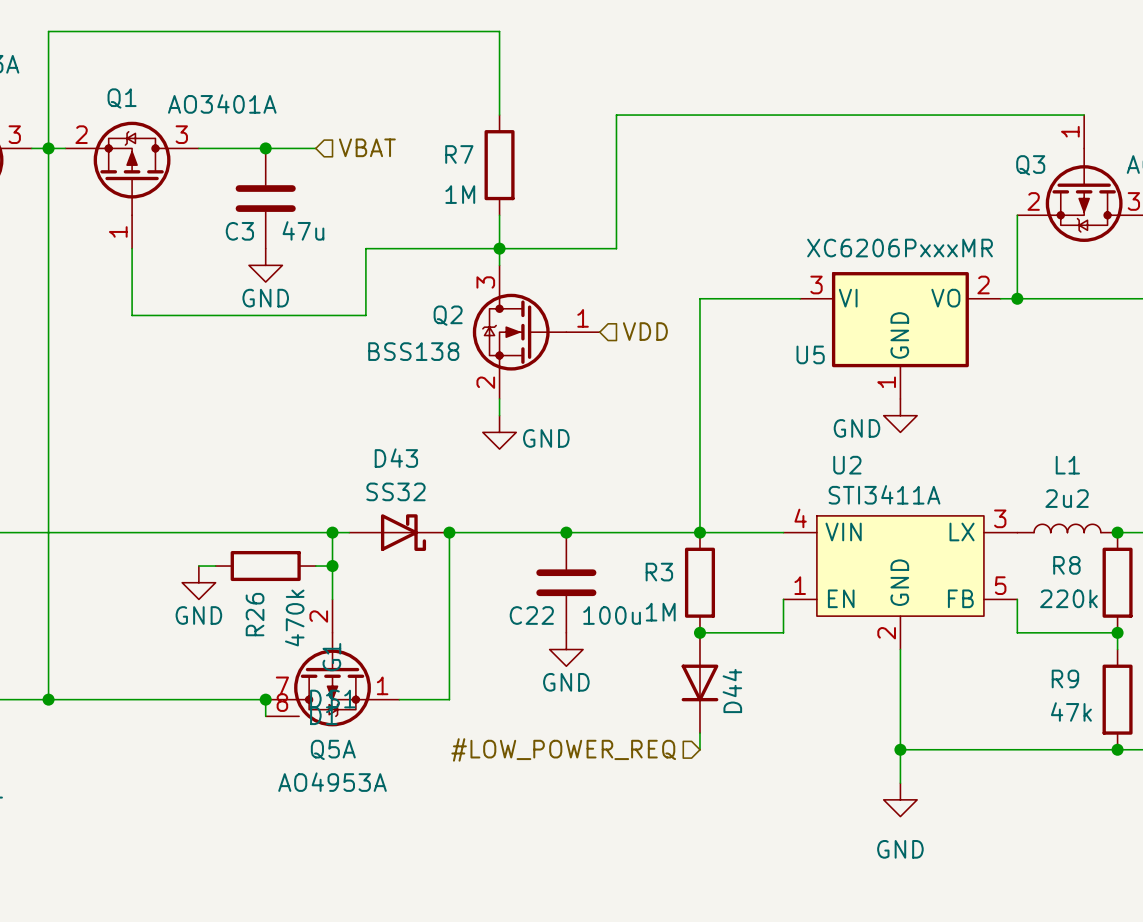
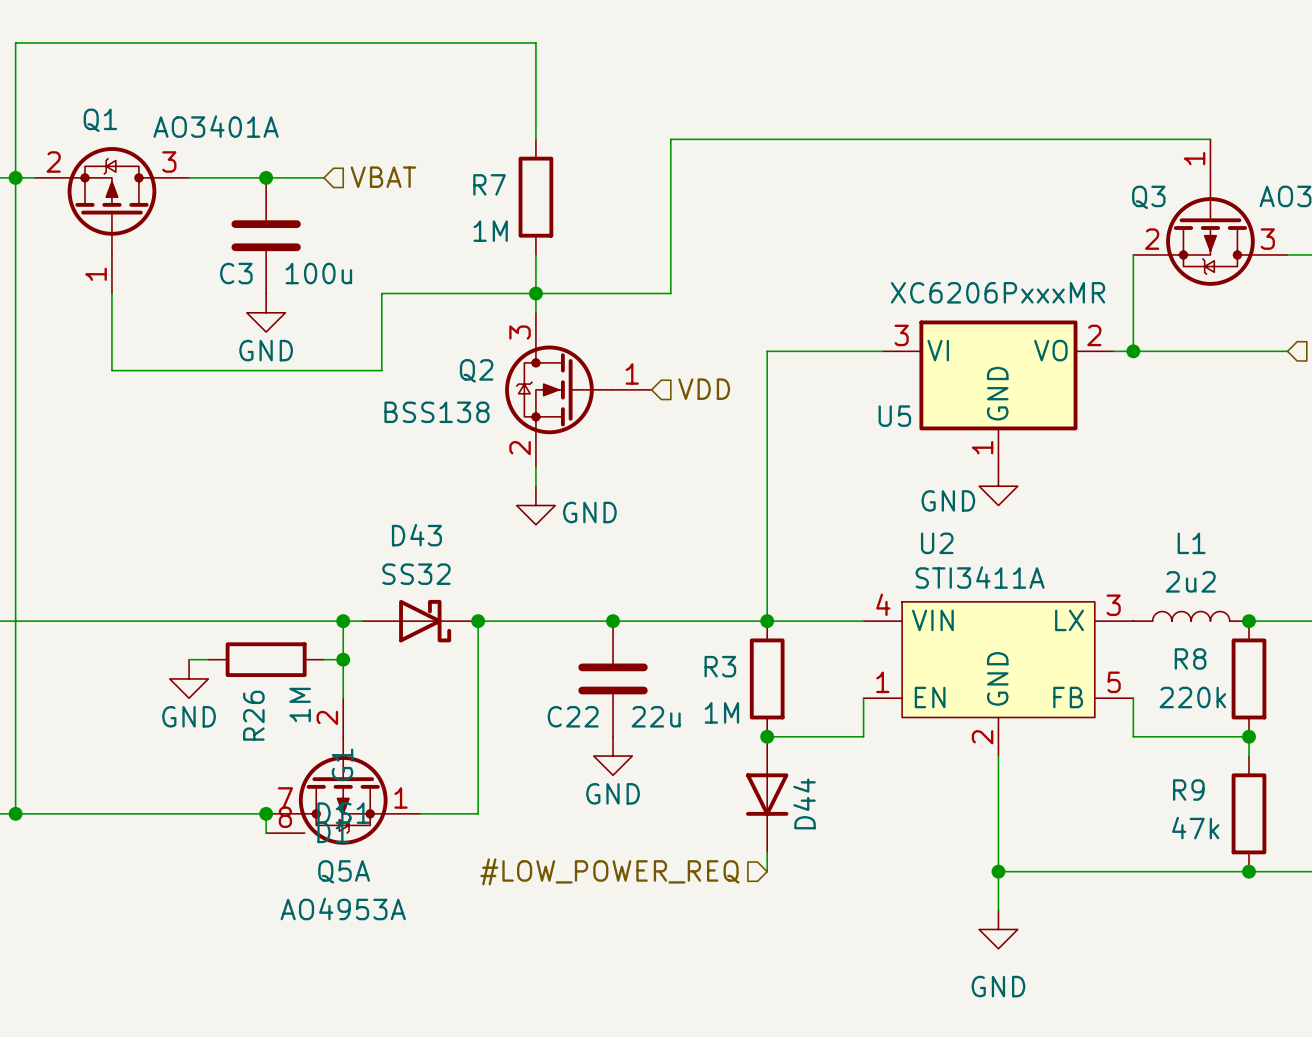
C3 value: 47u (303, 230) -> 100u (318, 273)
C22 value: 100u (612, 615) -> 22u (656, 716)
R26 value: 470k (294, 618) -> 1M (300, 704)

